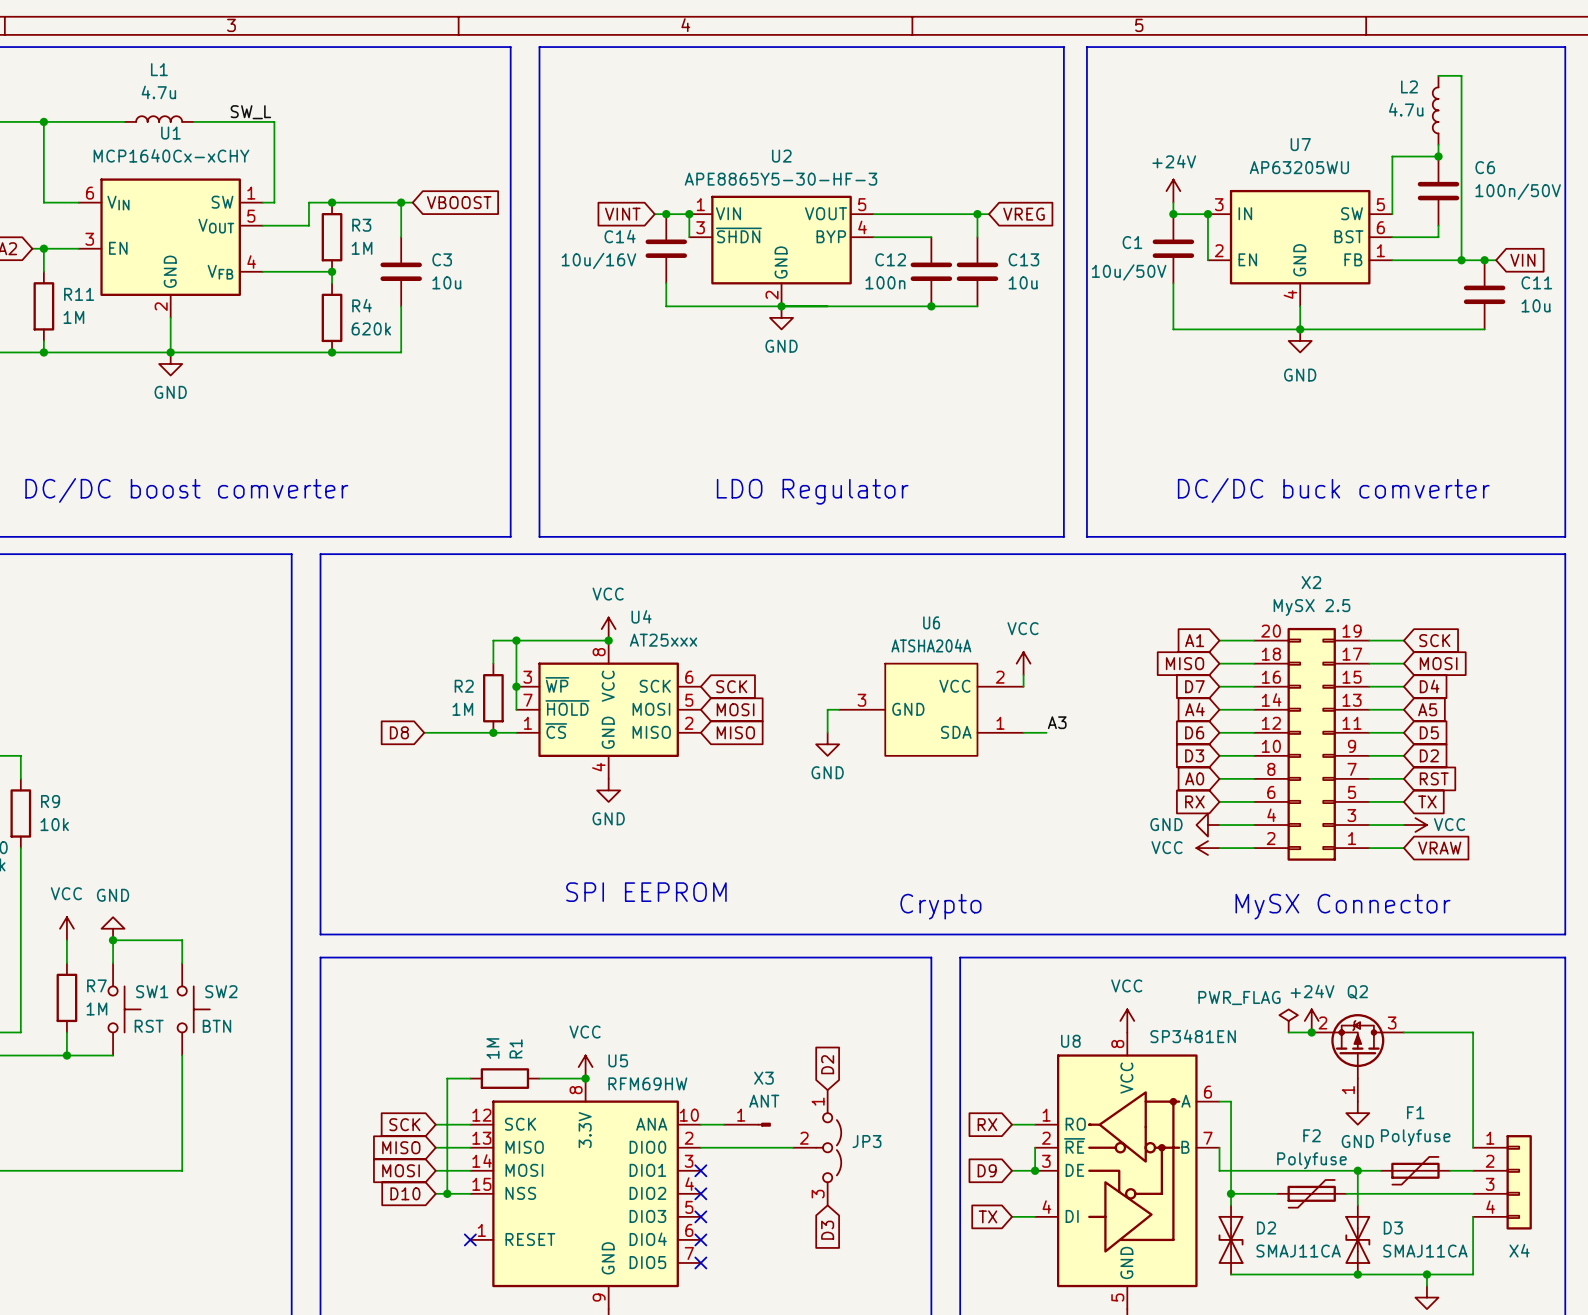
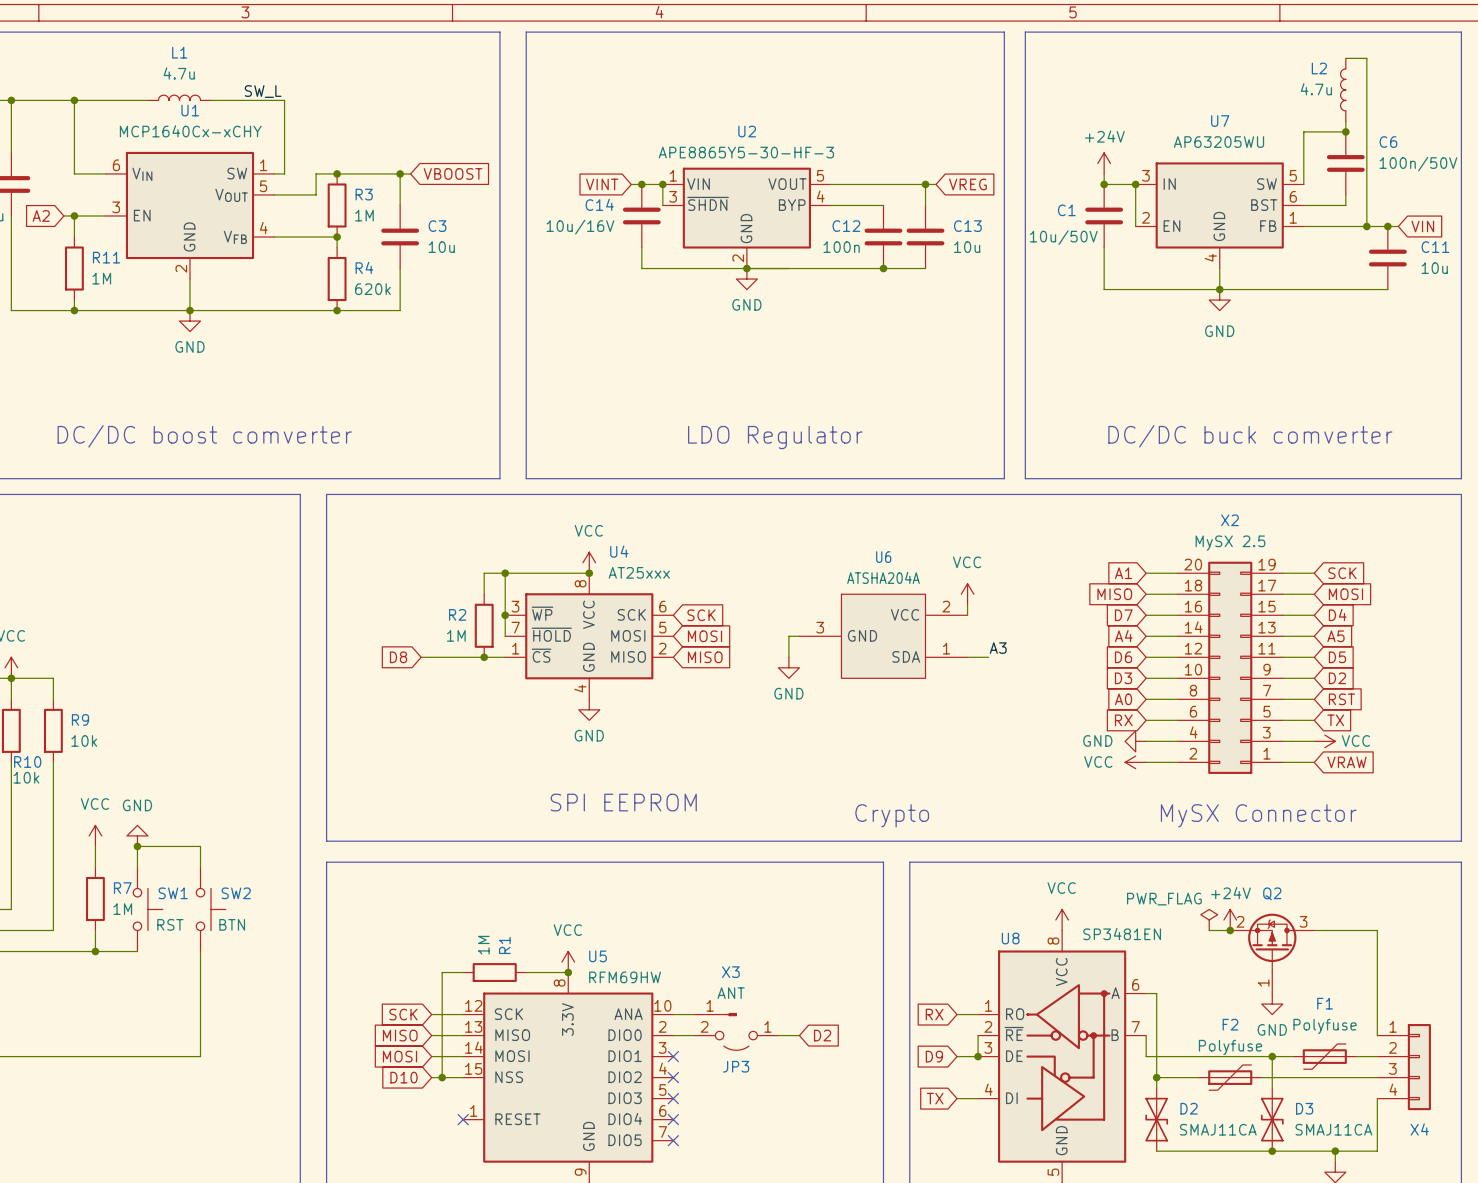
global label rotation: 0° (827, 1064) -> 90° clockwise (822, 1035)
global label position: D2 (827, 1064) -> D2 (822, 1035)
JP3 symbol: [793, 1090, 842, 1206] -> [694, 1031, 779, 1051]
JP3 name position: JP3 (866, 1141) -> JP3 (736, 1066)
wire: (723, 1147) (793, 1147) -> none
wire: none -> (778, 1035) (799, 1035)
global label: D3 (827, 1230) -> none

